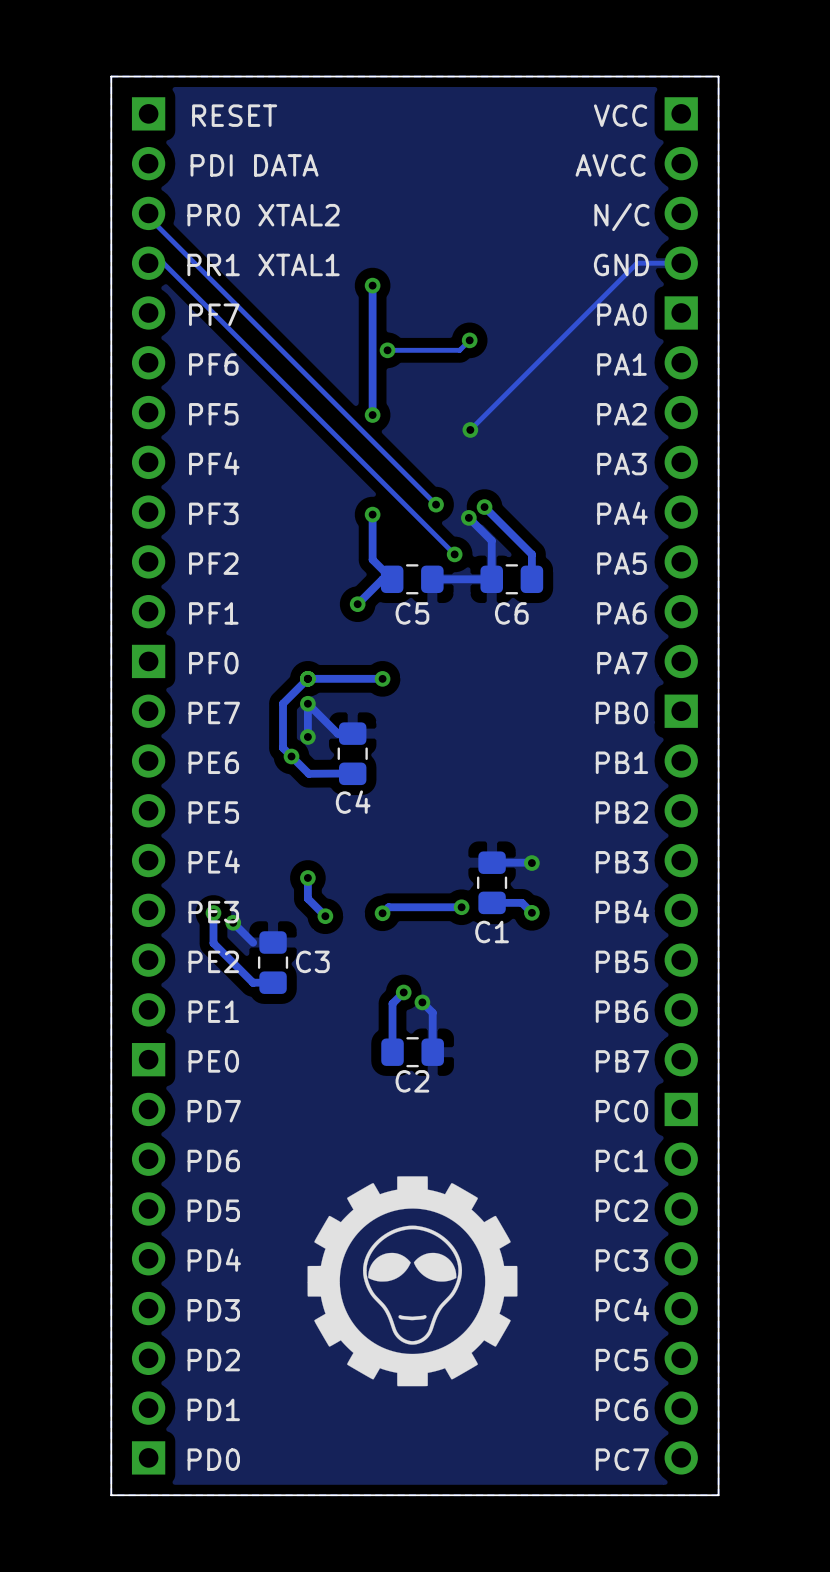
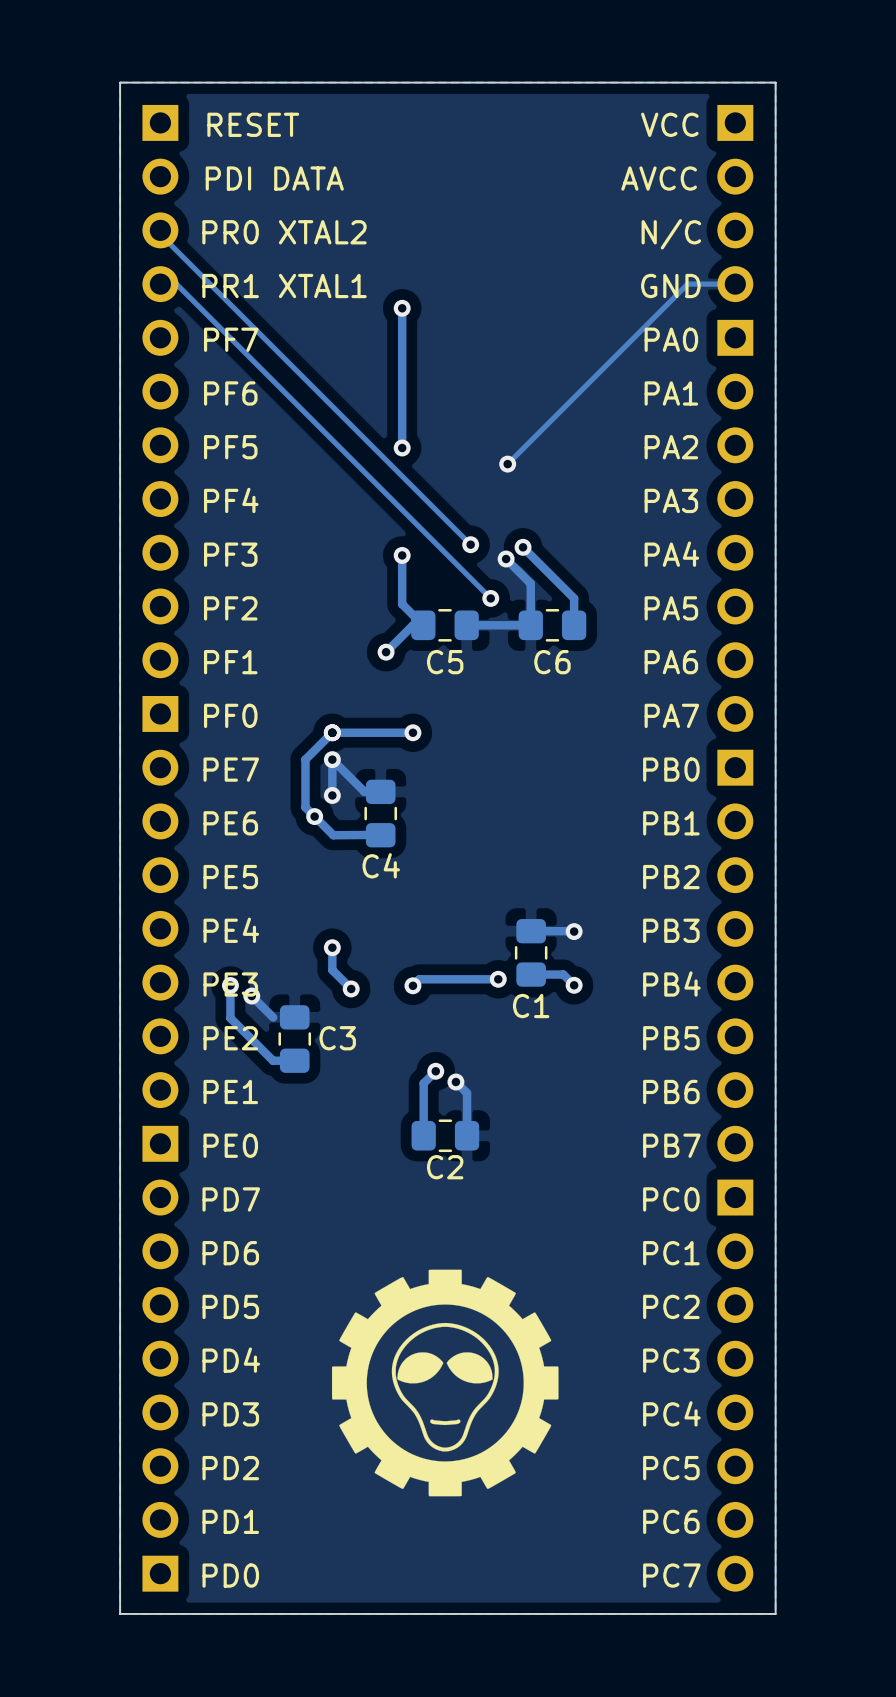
track: (469, 340) (459, 350) (387, 350) -> none
via: (469, 340) -> none
via: (387, 350) -> none

